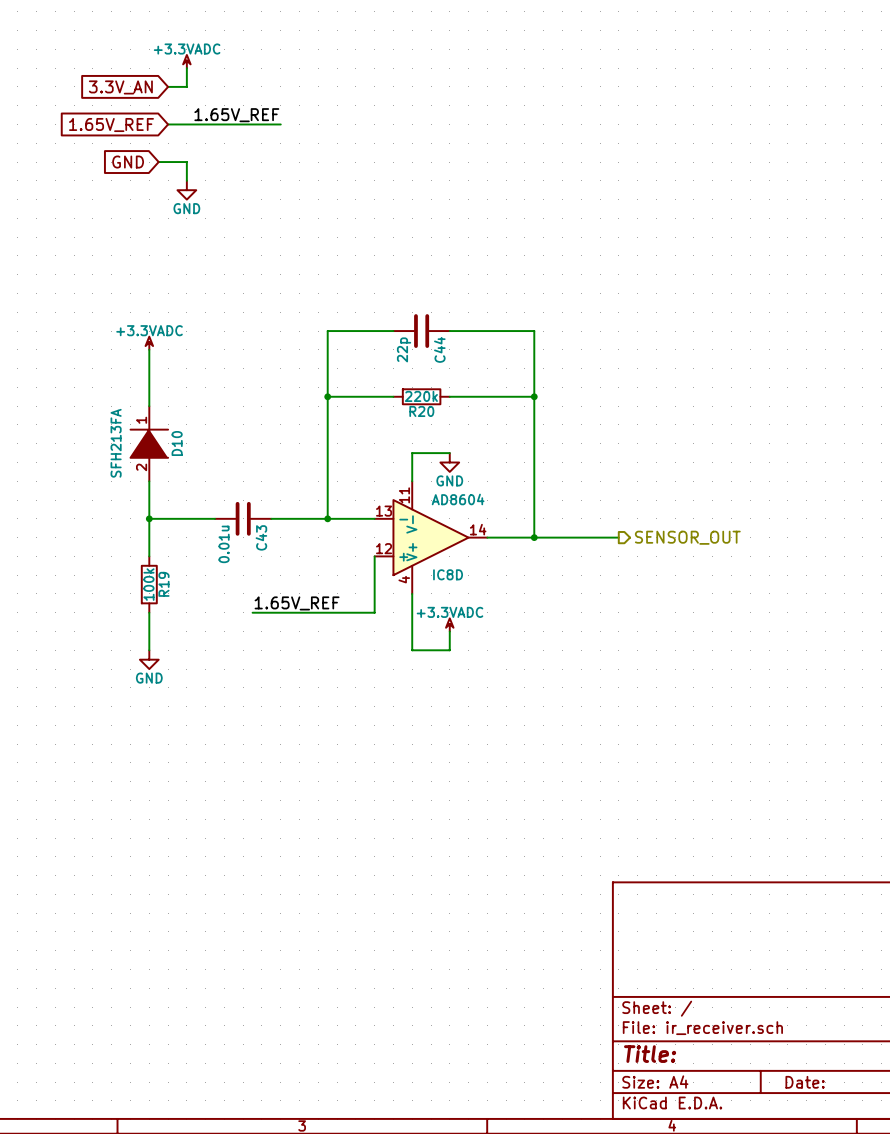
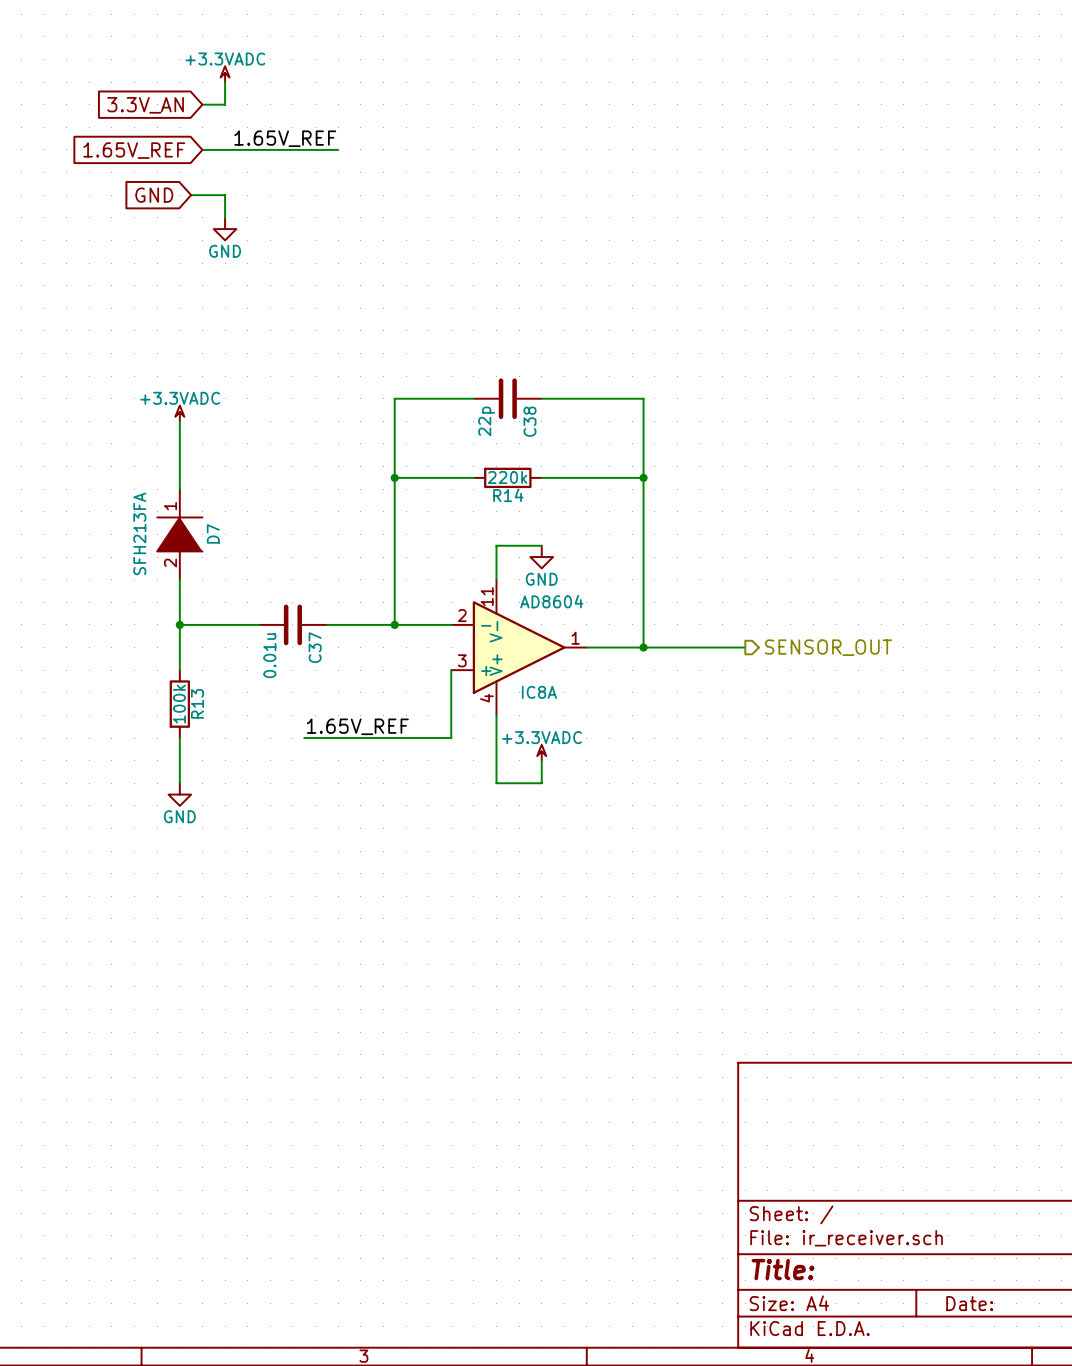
C44 name: C44 (439, 349) -> C38 (530, 421)
R20 name: R20 (421, 411) -> R14 (508, 495)
D10 name: D10 (177, 443) -> D7 (213, 533)
IC8D pin number: 13 (384, 511) -> 2 (462, 615)
IC8D pin number: 14 (478, 529) -> 1 (575, 638)
C43 name: C43 (261, 537) -> C37 (315, 647)
IC8D pin number: 12 (384, 548) -> 3 (462, 660)
IC8D name: IC8D (448, 574) -> IC8A (539, 692)
R19 name: R19 (163, 584) -> R13 (197, 703)

